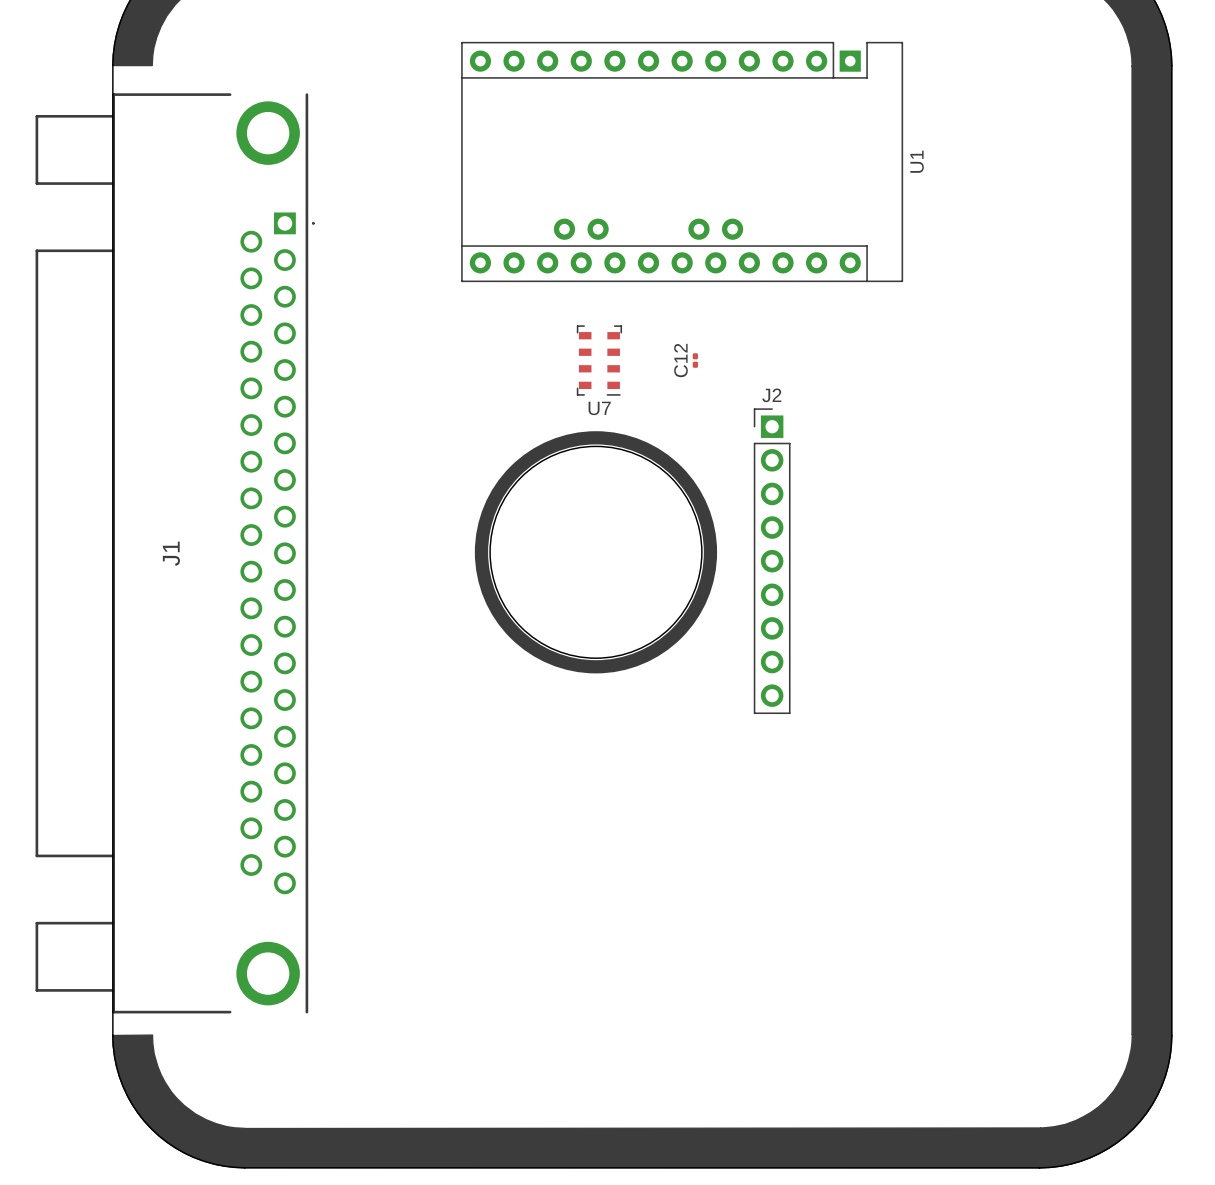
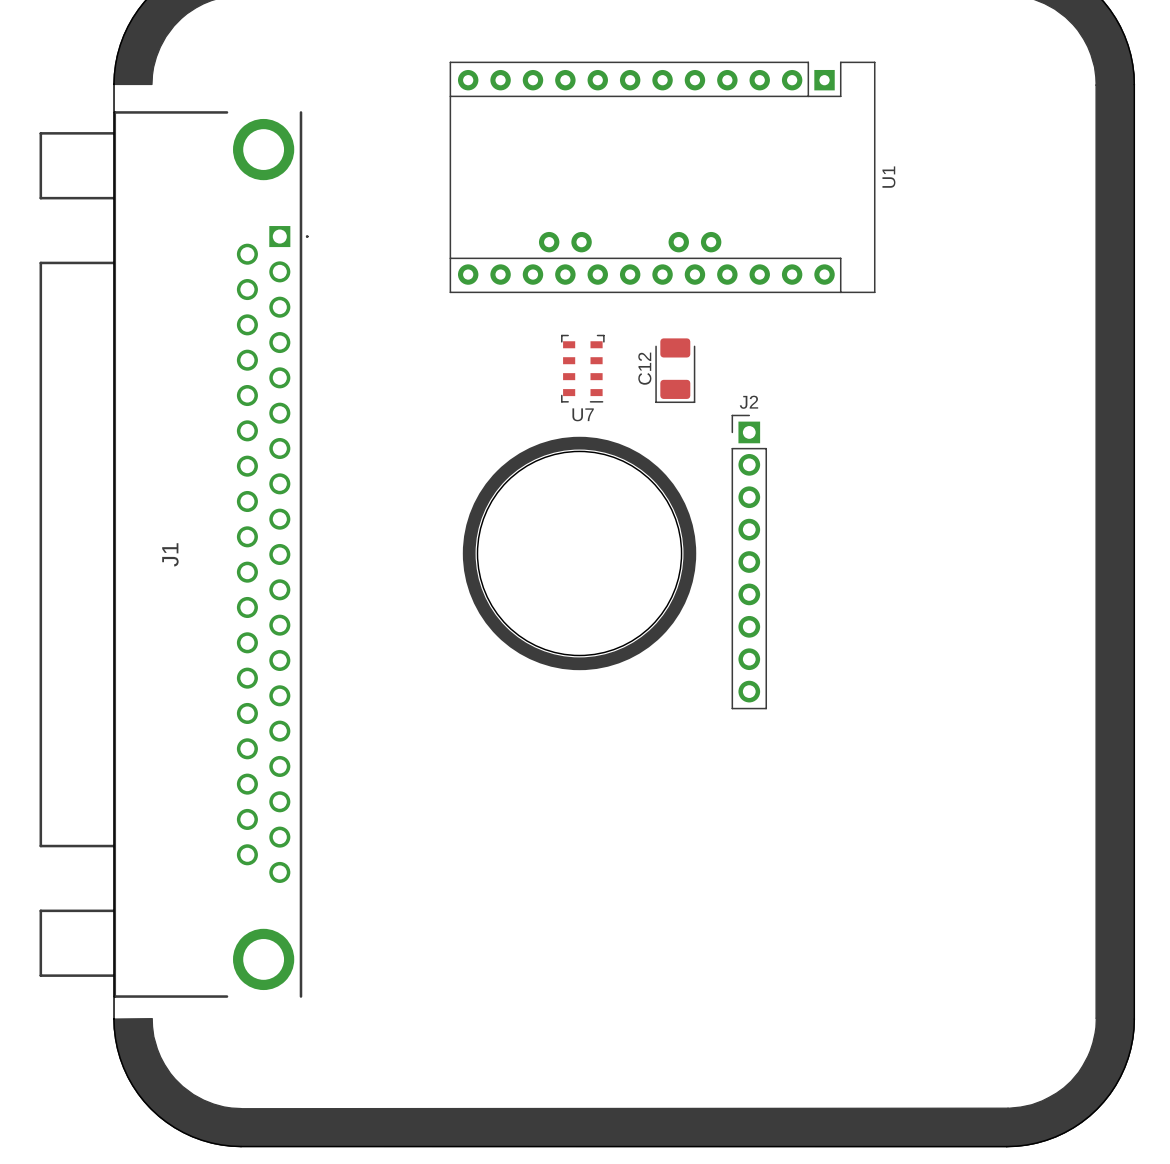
C12 footprint: [692, 353, 699, 368] -> [655, 338, 696, 404]

